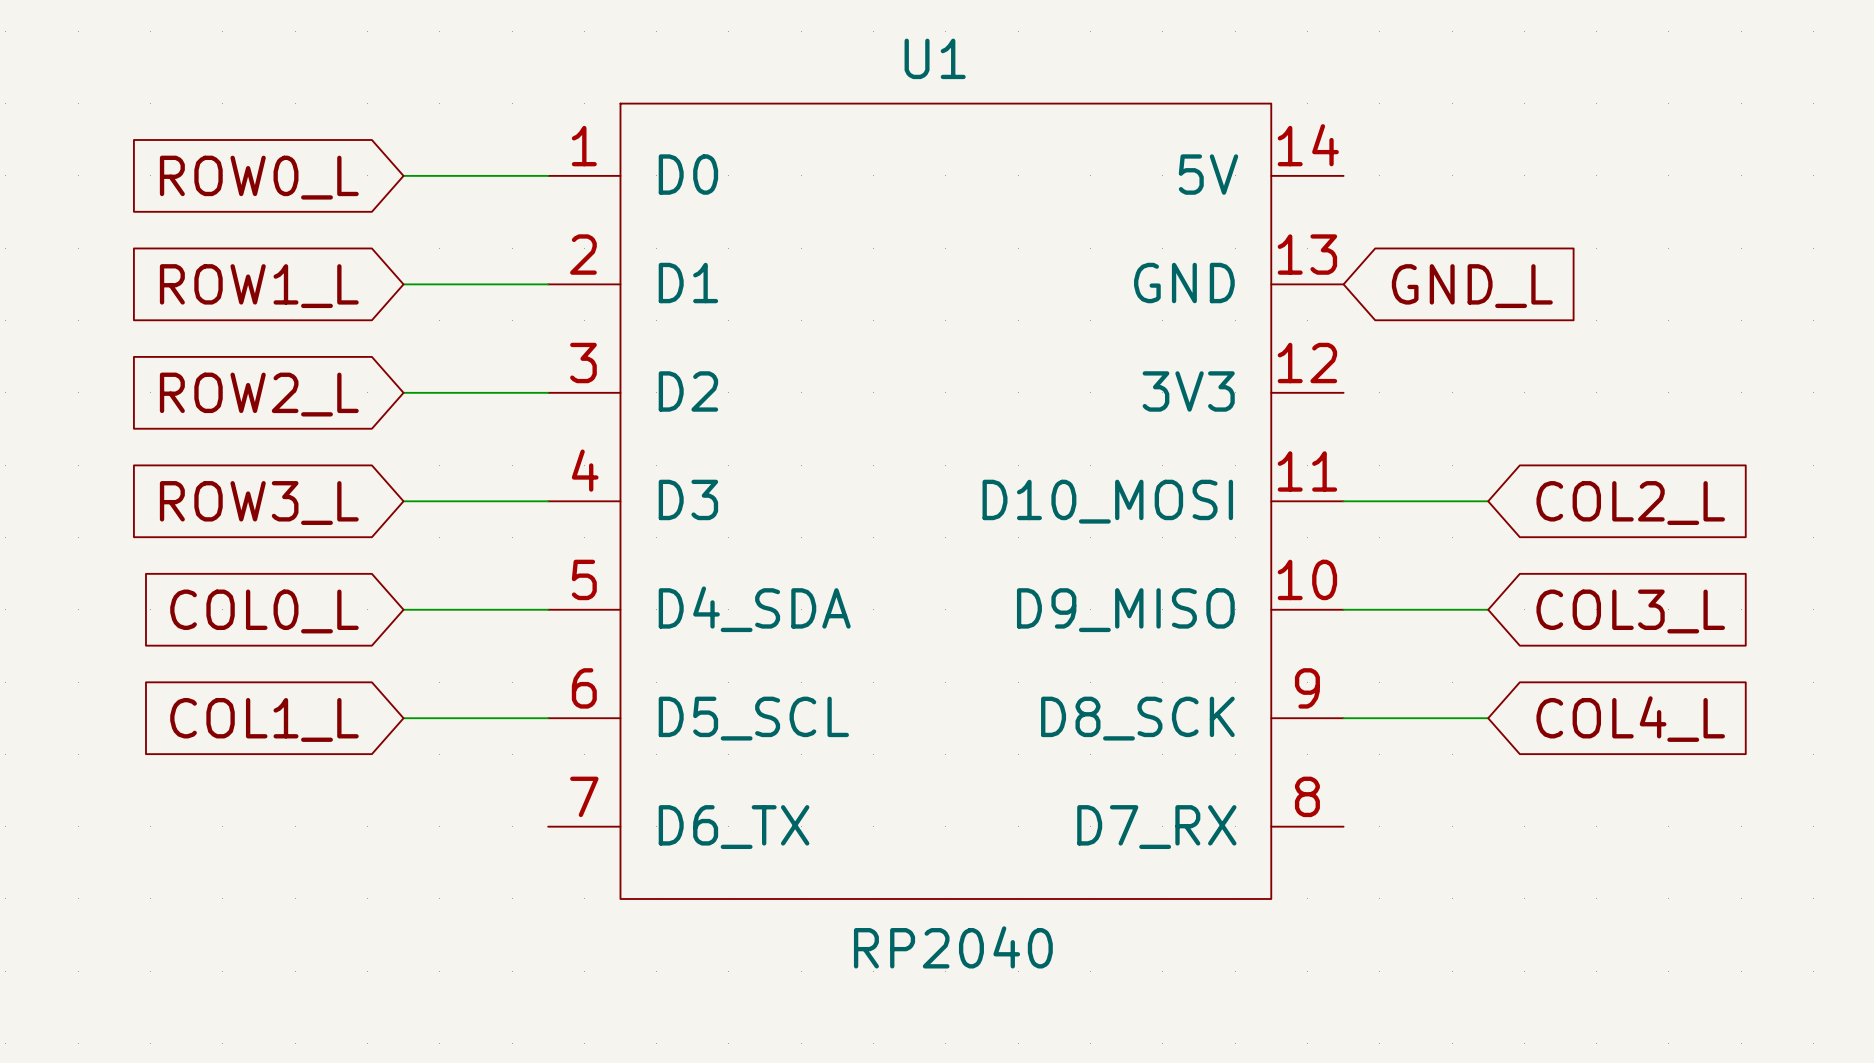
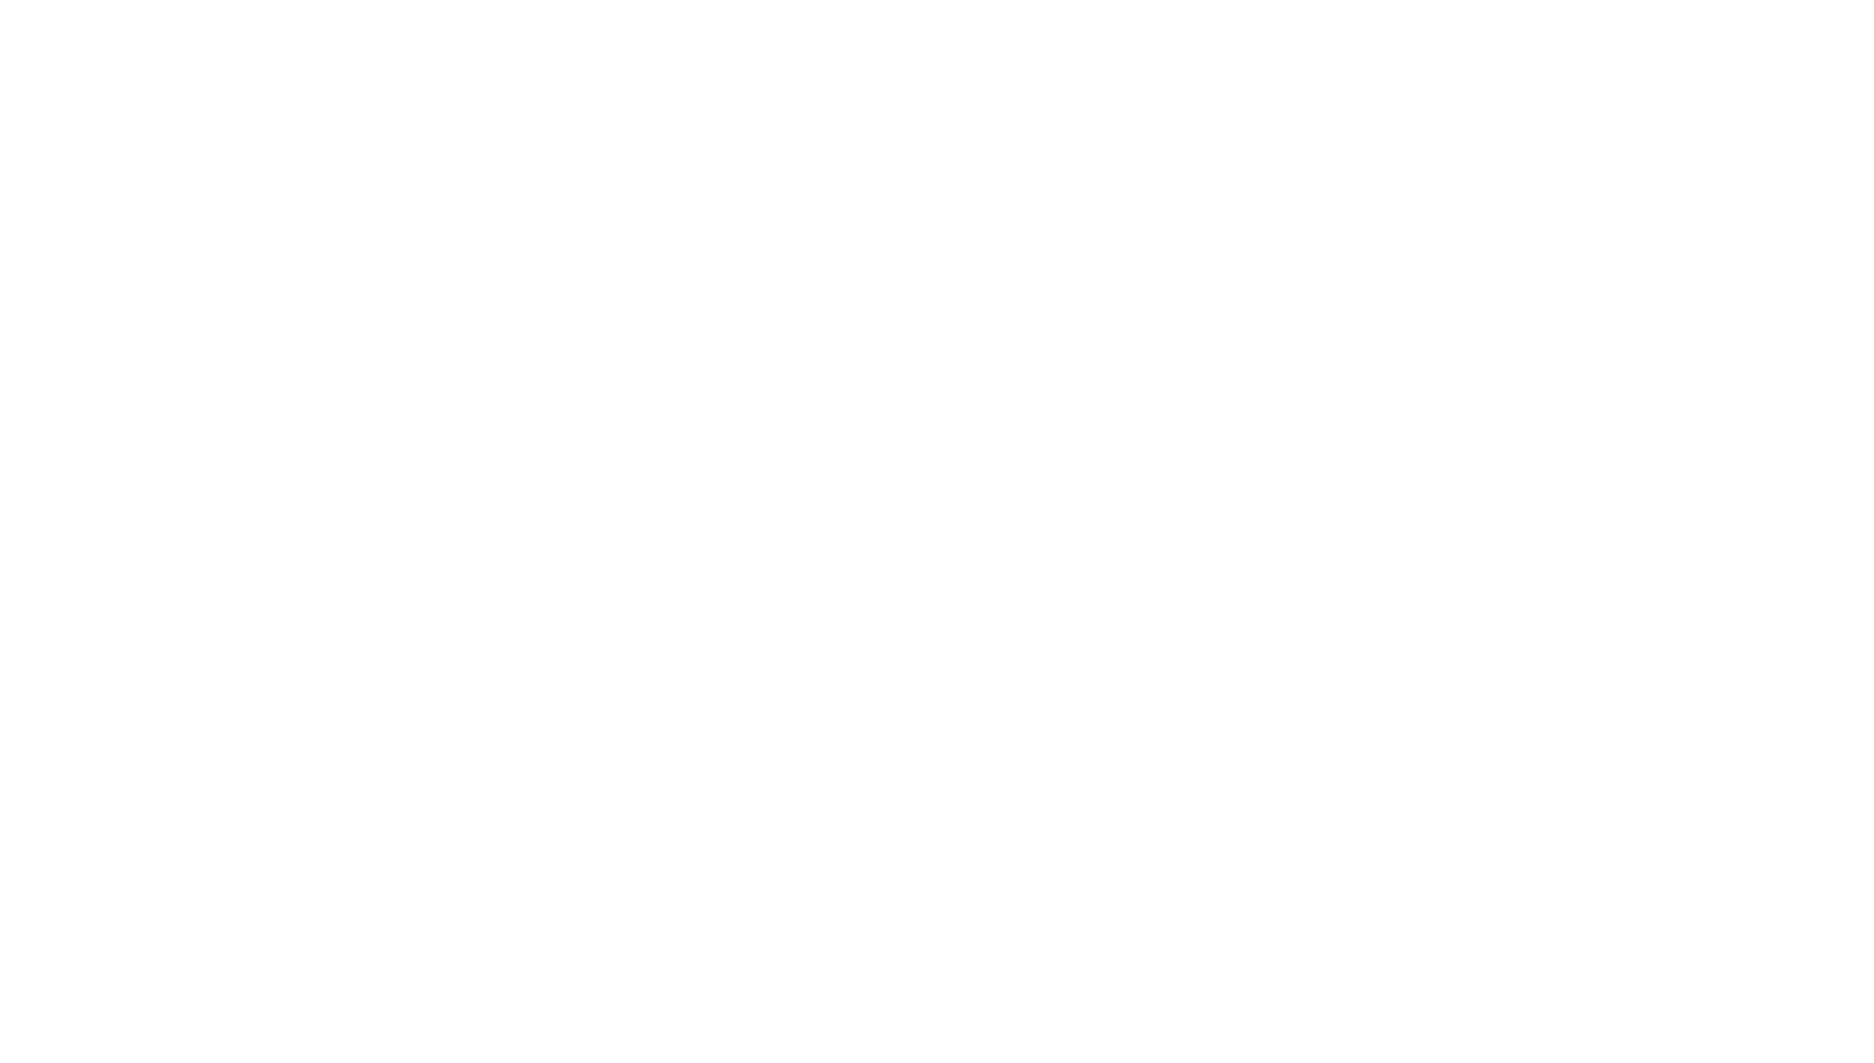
wire: (403, 175) (548, 175) -> none
global label: ROW0_L (259, 177) -> none
wire: (403, 284) (548, 284) -> none
global label: ROW1_L (259, 286) -> none
global label: GND_L (1472, 286) -> none
wire: (403, 392) (548, 392) -> none
global label: ROW2_L (259, 394) -> none
wire: (403, 501) (548, 501) -> none
U1: RP2040 (945, 501) -> none
wire: (1343, 501) (1488, 501) -> none
global label: ROW3_L (259, 503) -> none
global label: COL2_L (1630, 503) -> none
wire: (403, 609) (548, 609) -> none
wire: (1343, 609) (1488, 609) -> none
global label: COL0_L (264, 611) -> none
global label: COL3_L (1630, 611) -> none
wire: (403, 718) (548, 718) -> none
wire: (1343, 718) (1488, 718) -> none
global label: COL1_L (264, 719) -> none
global label: COL4_L (1630, 719) -> none

